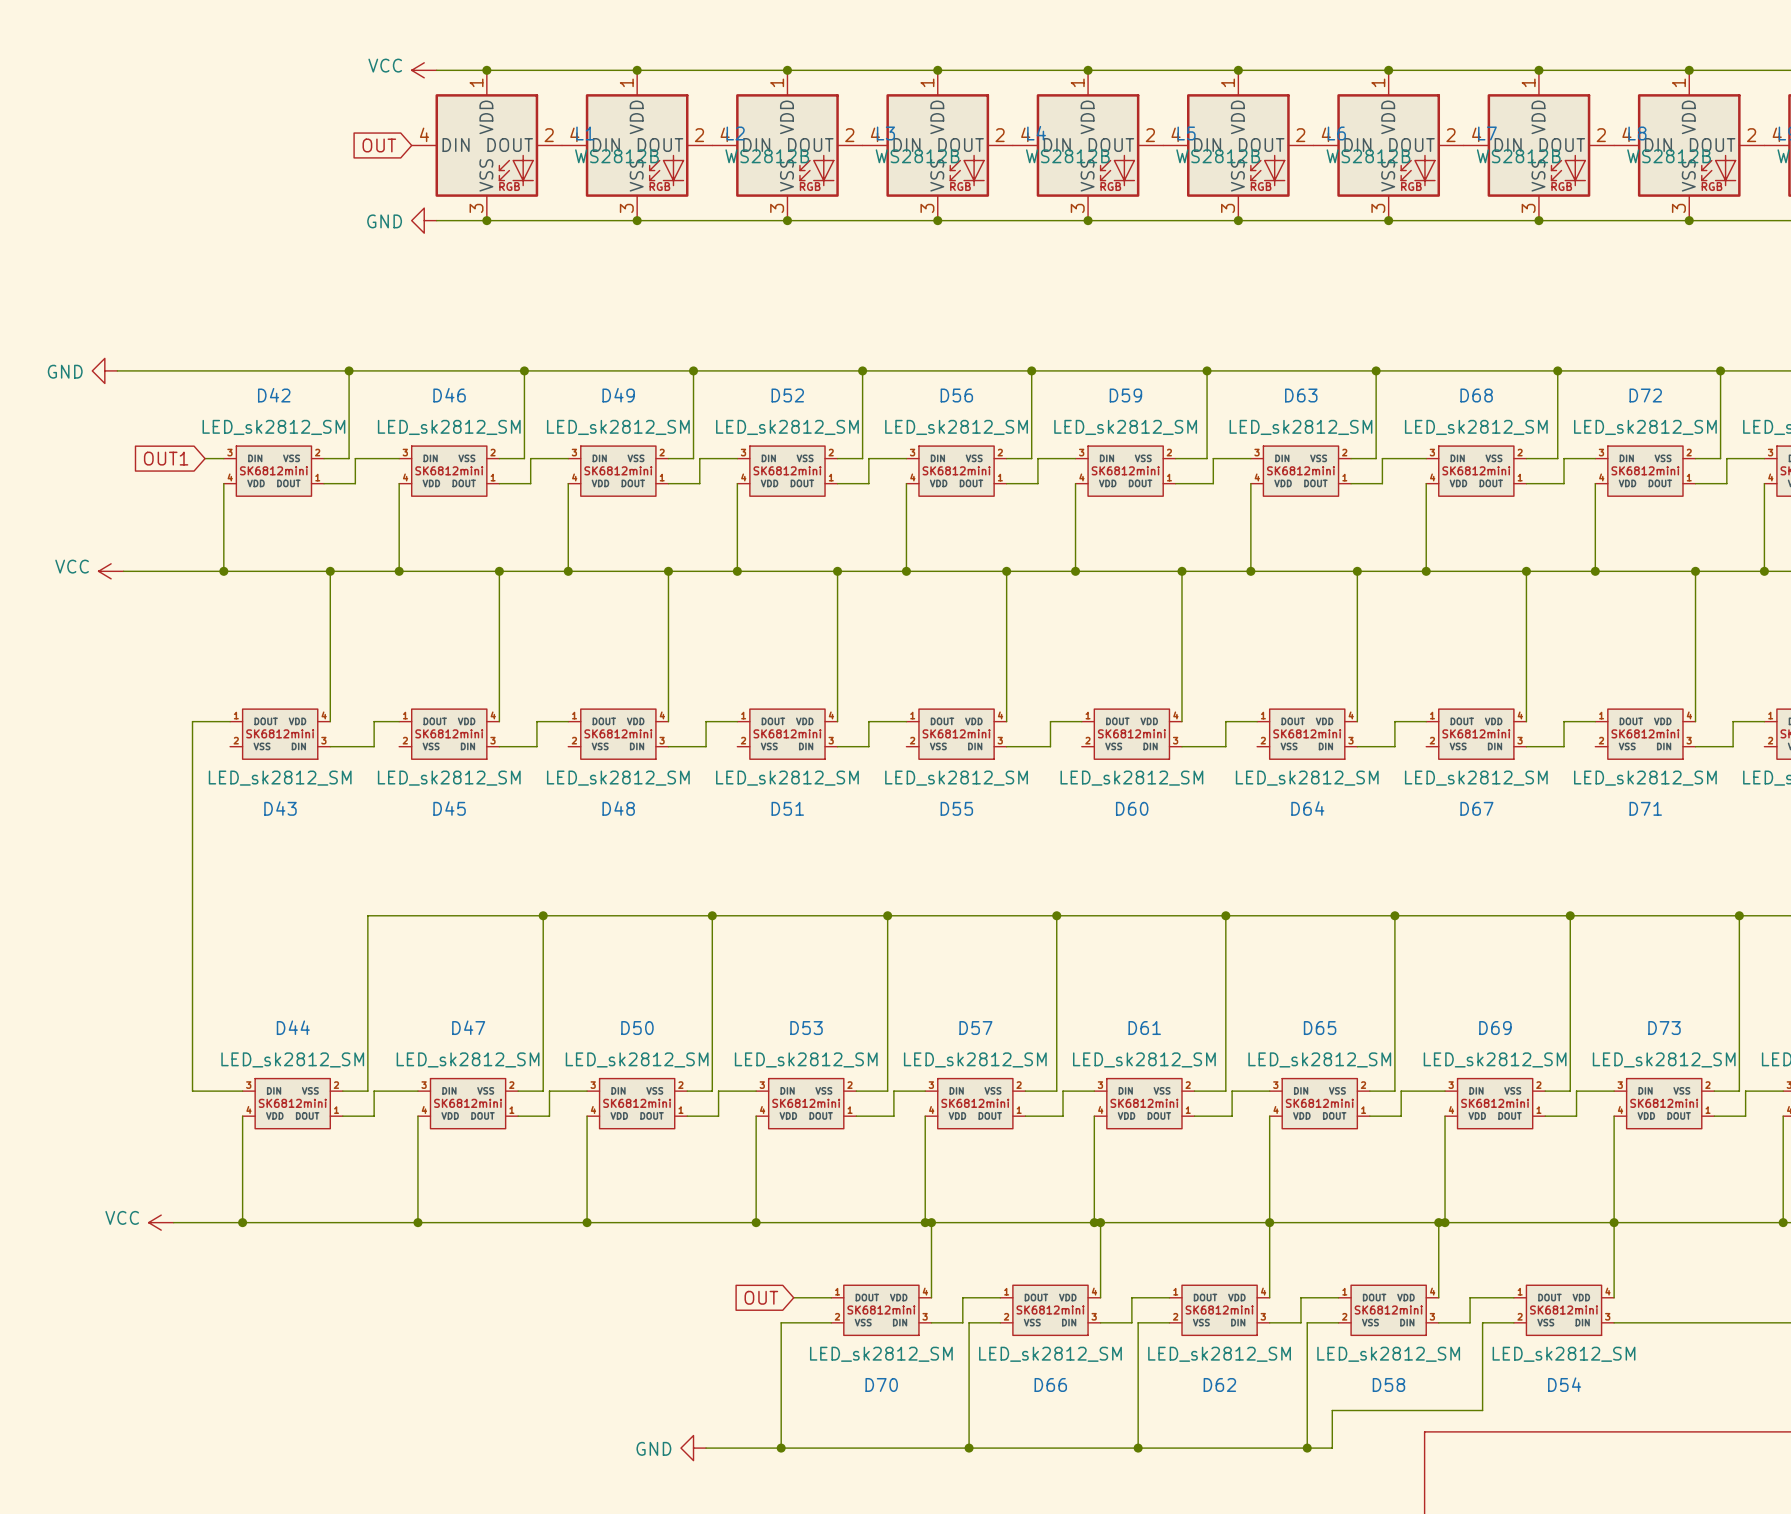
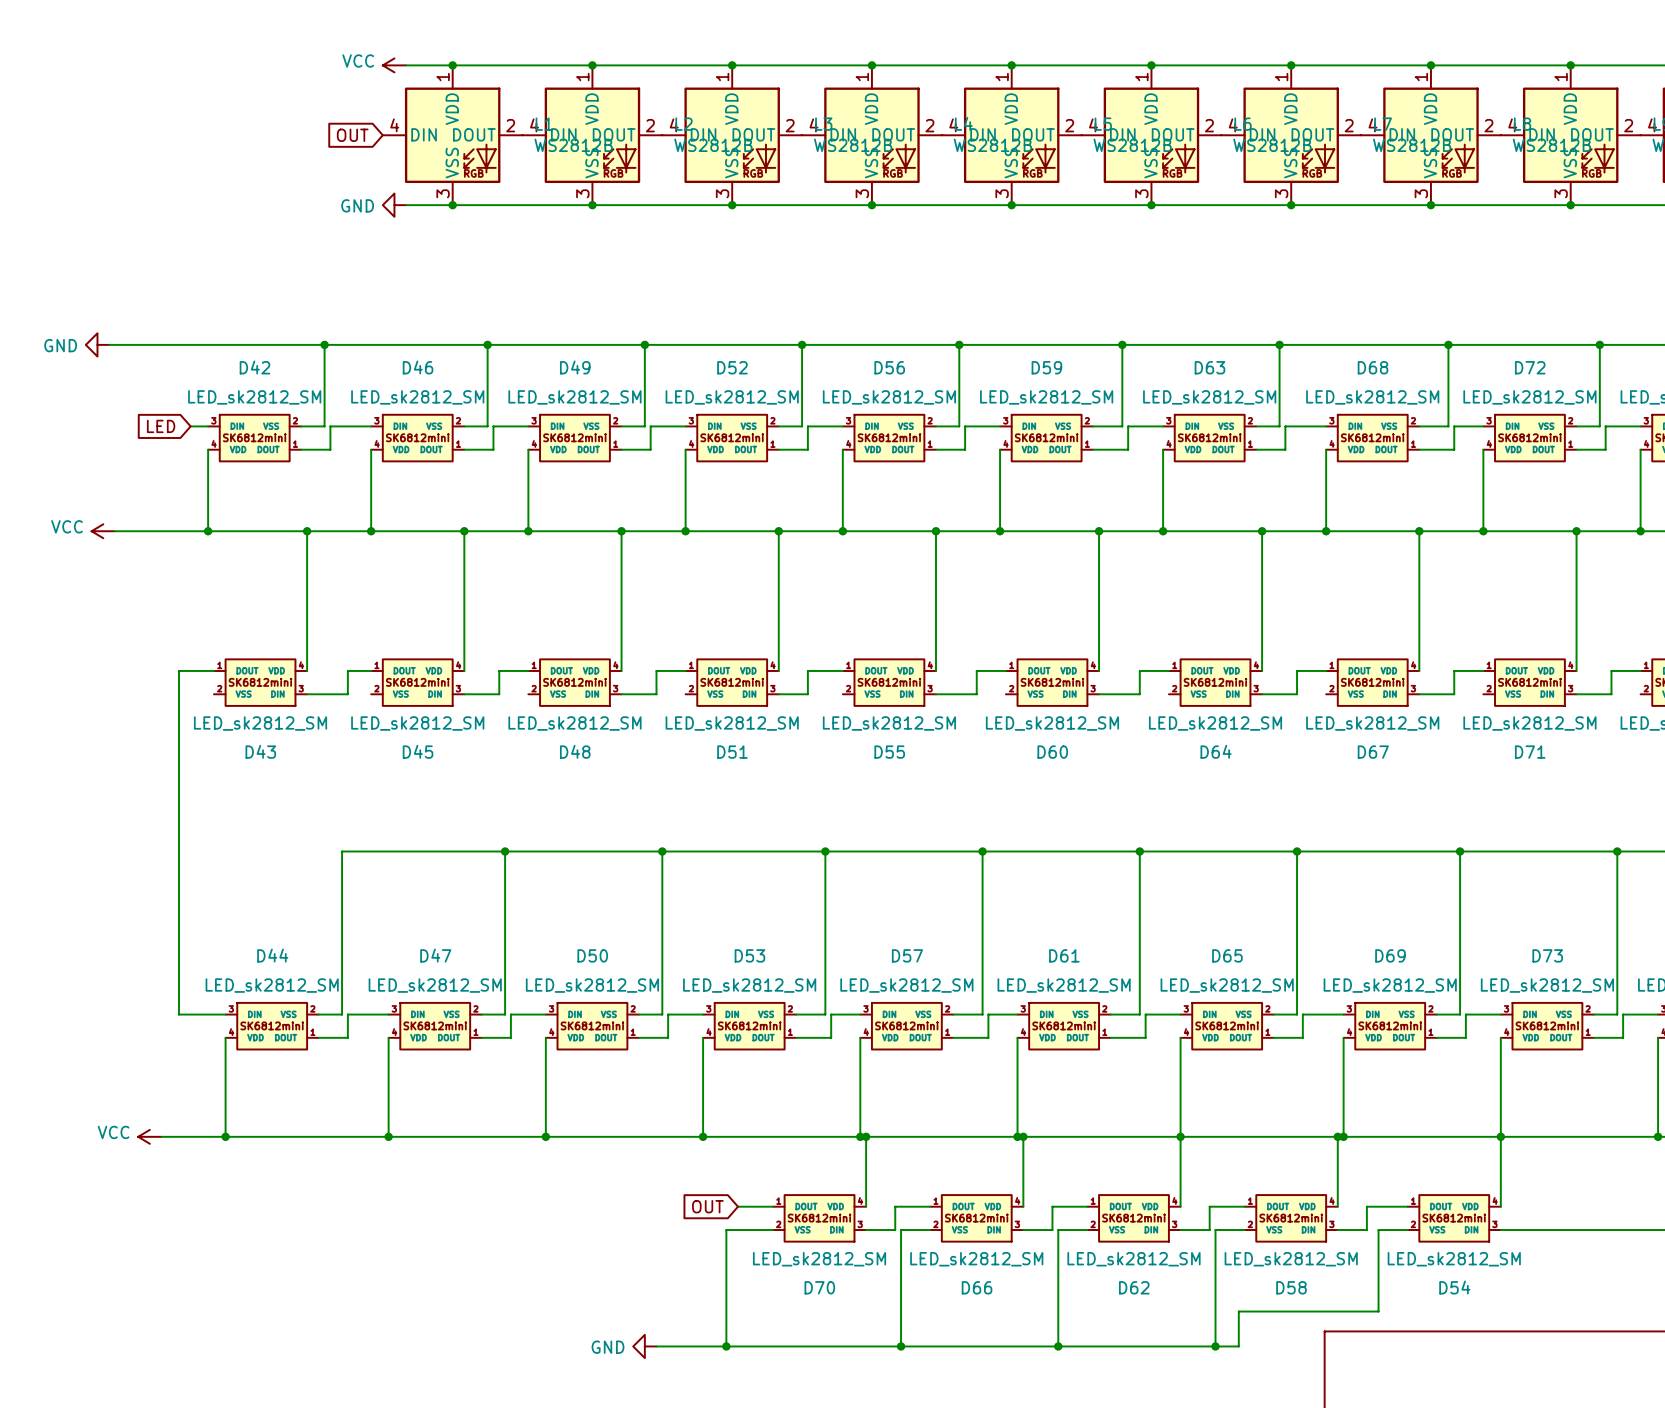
global label: OUT1 (166, 458) -> LED (161, 426)

